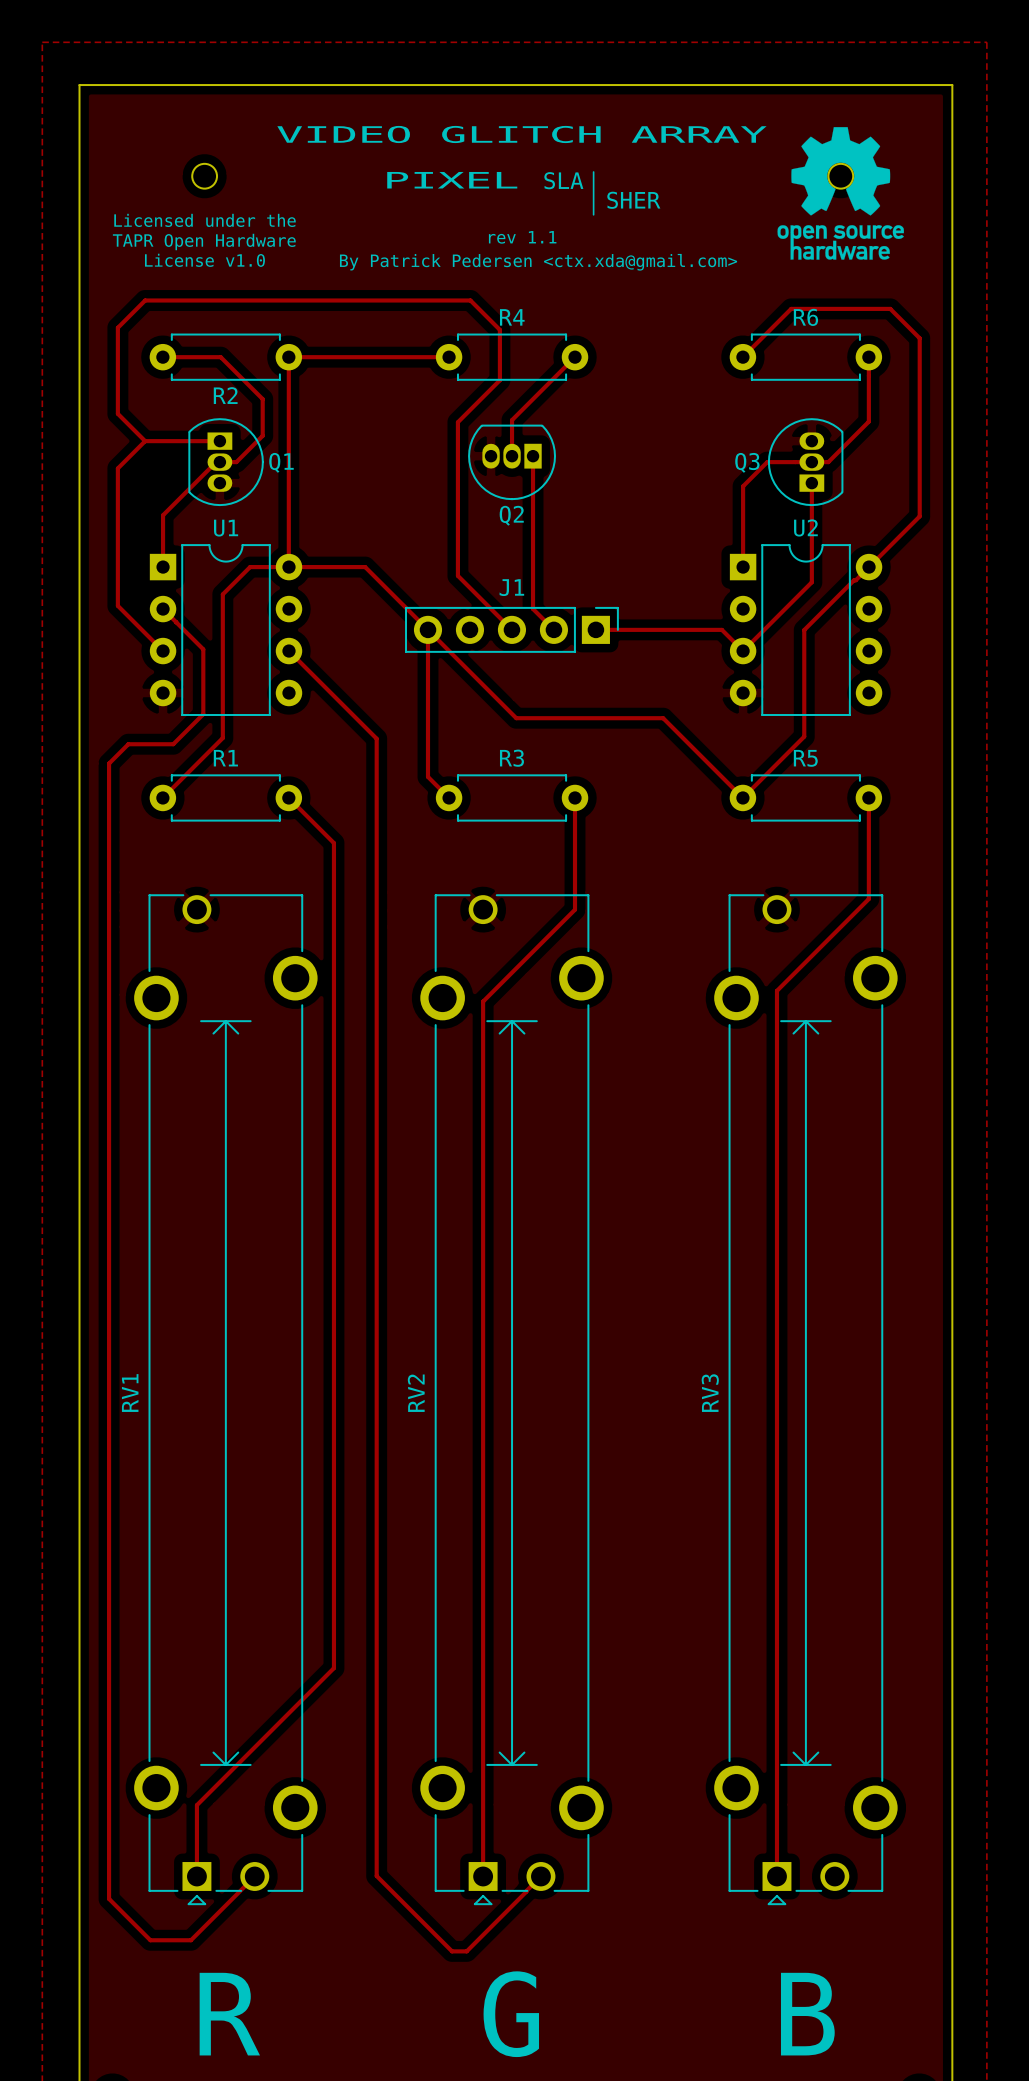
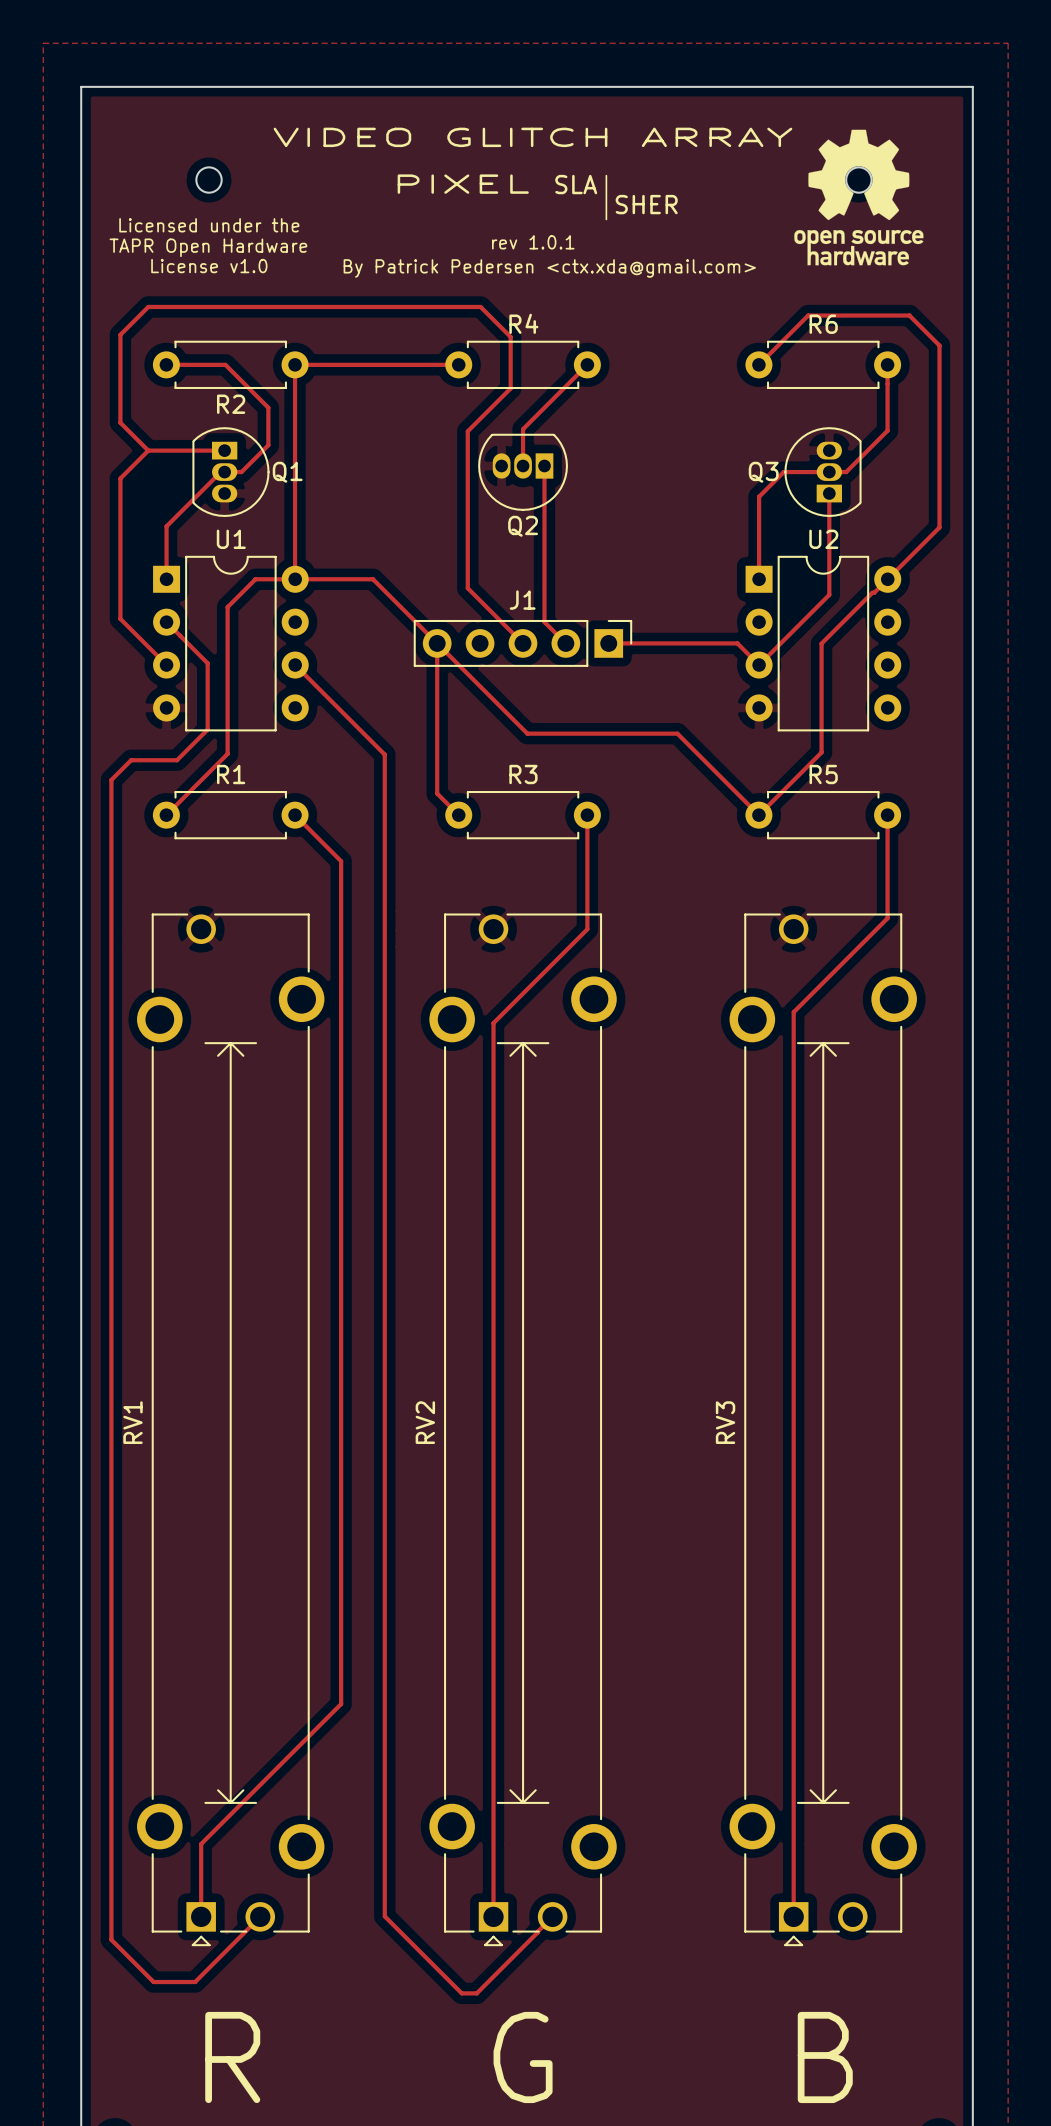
text: rev 1.1 (522, 237) -> rev 1.0.1 (533, 242)

